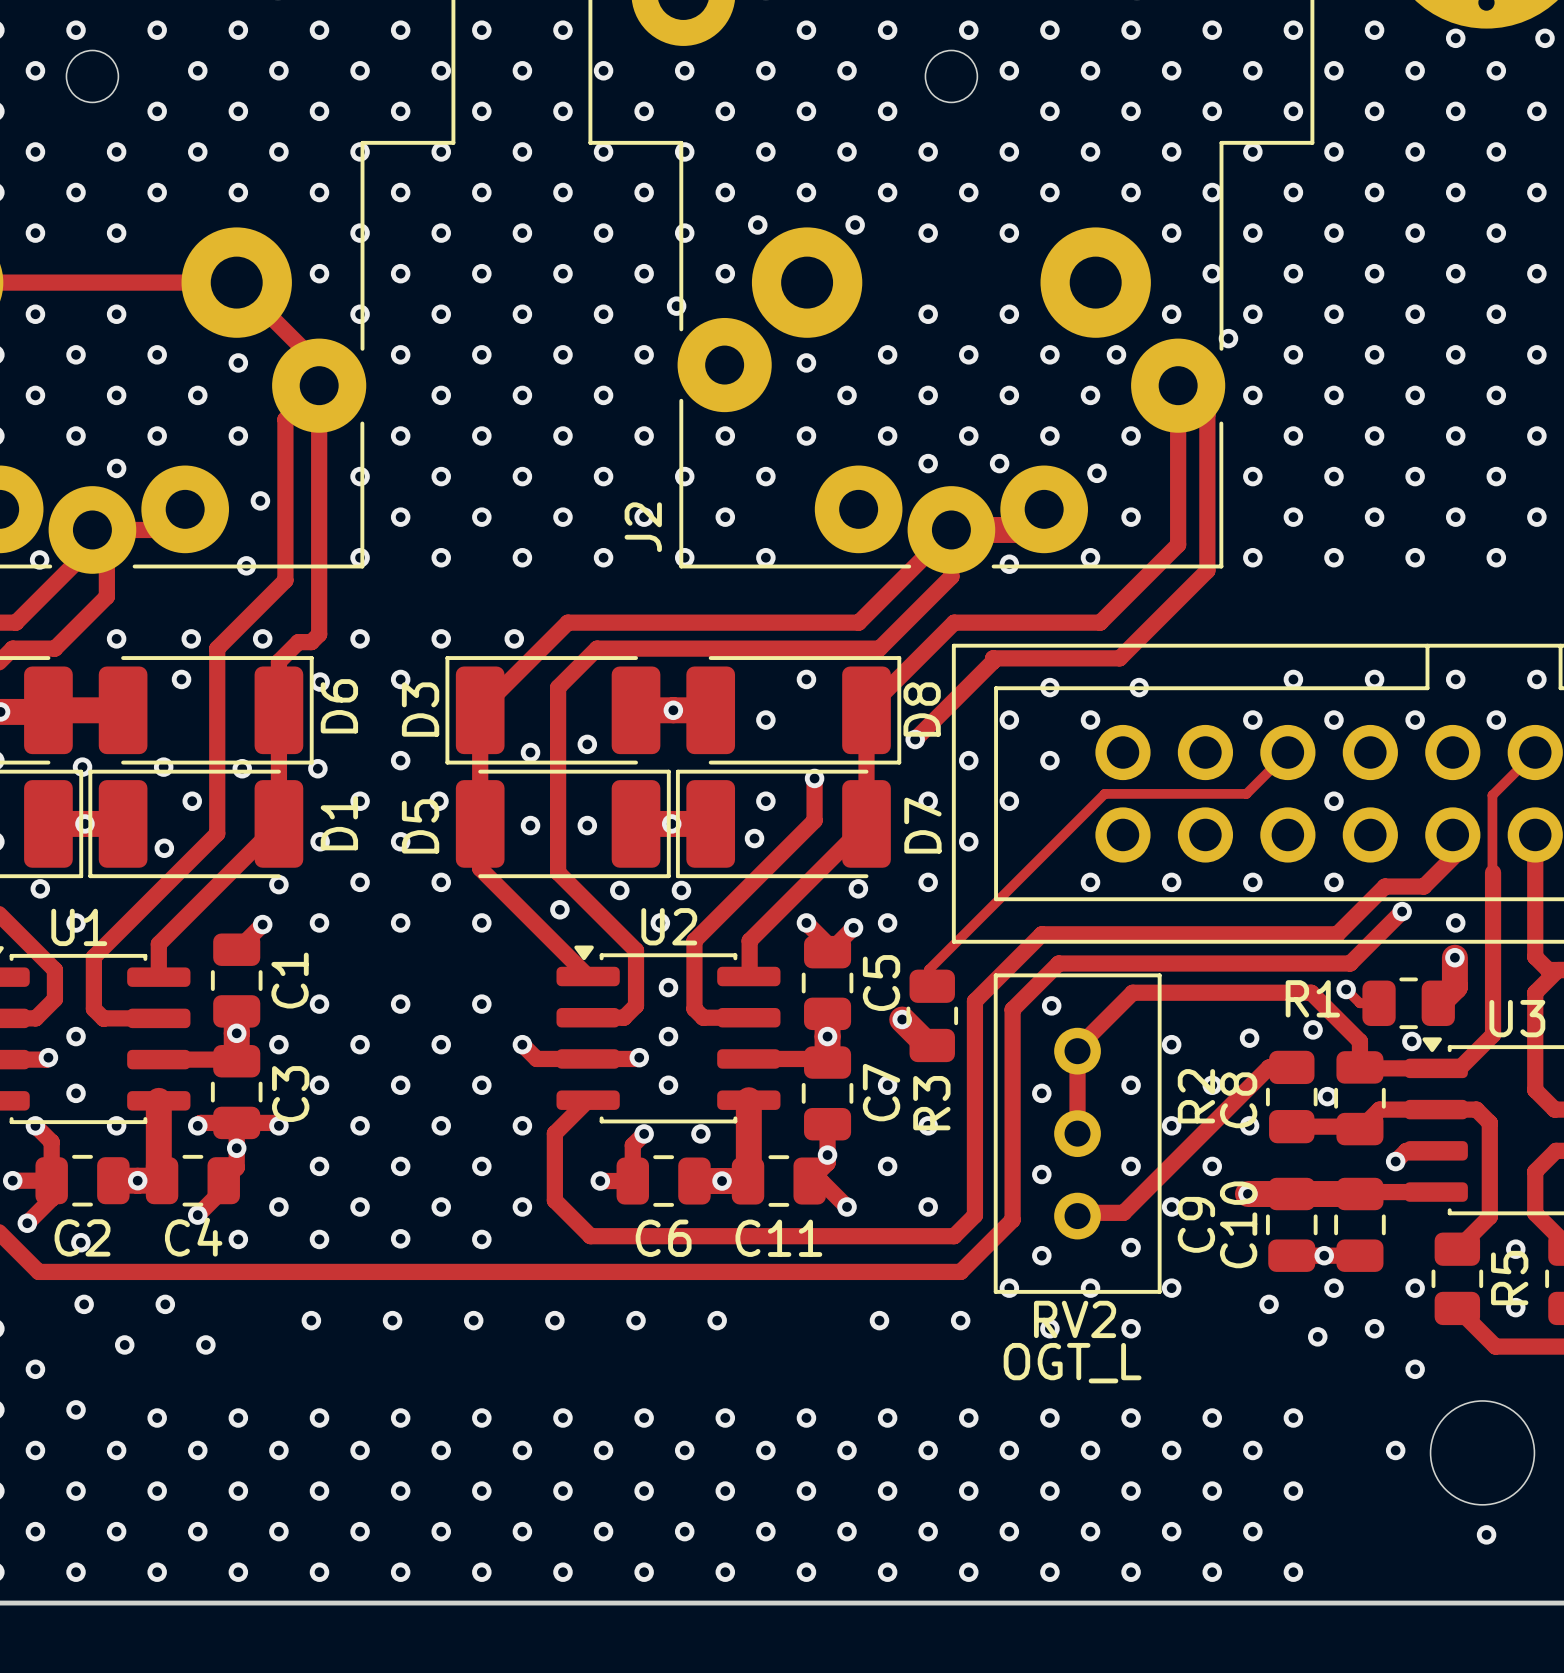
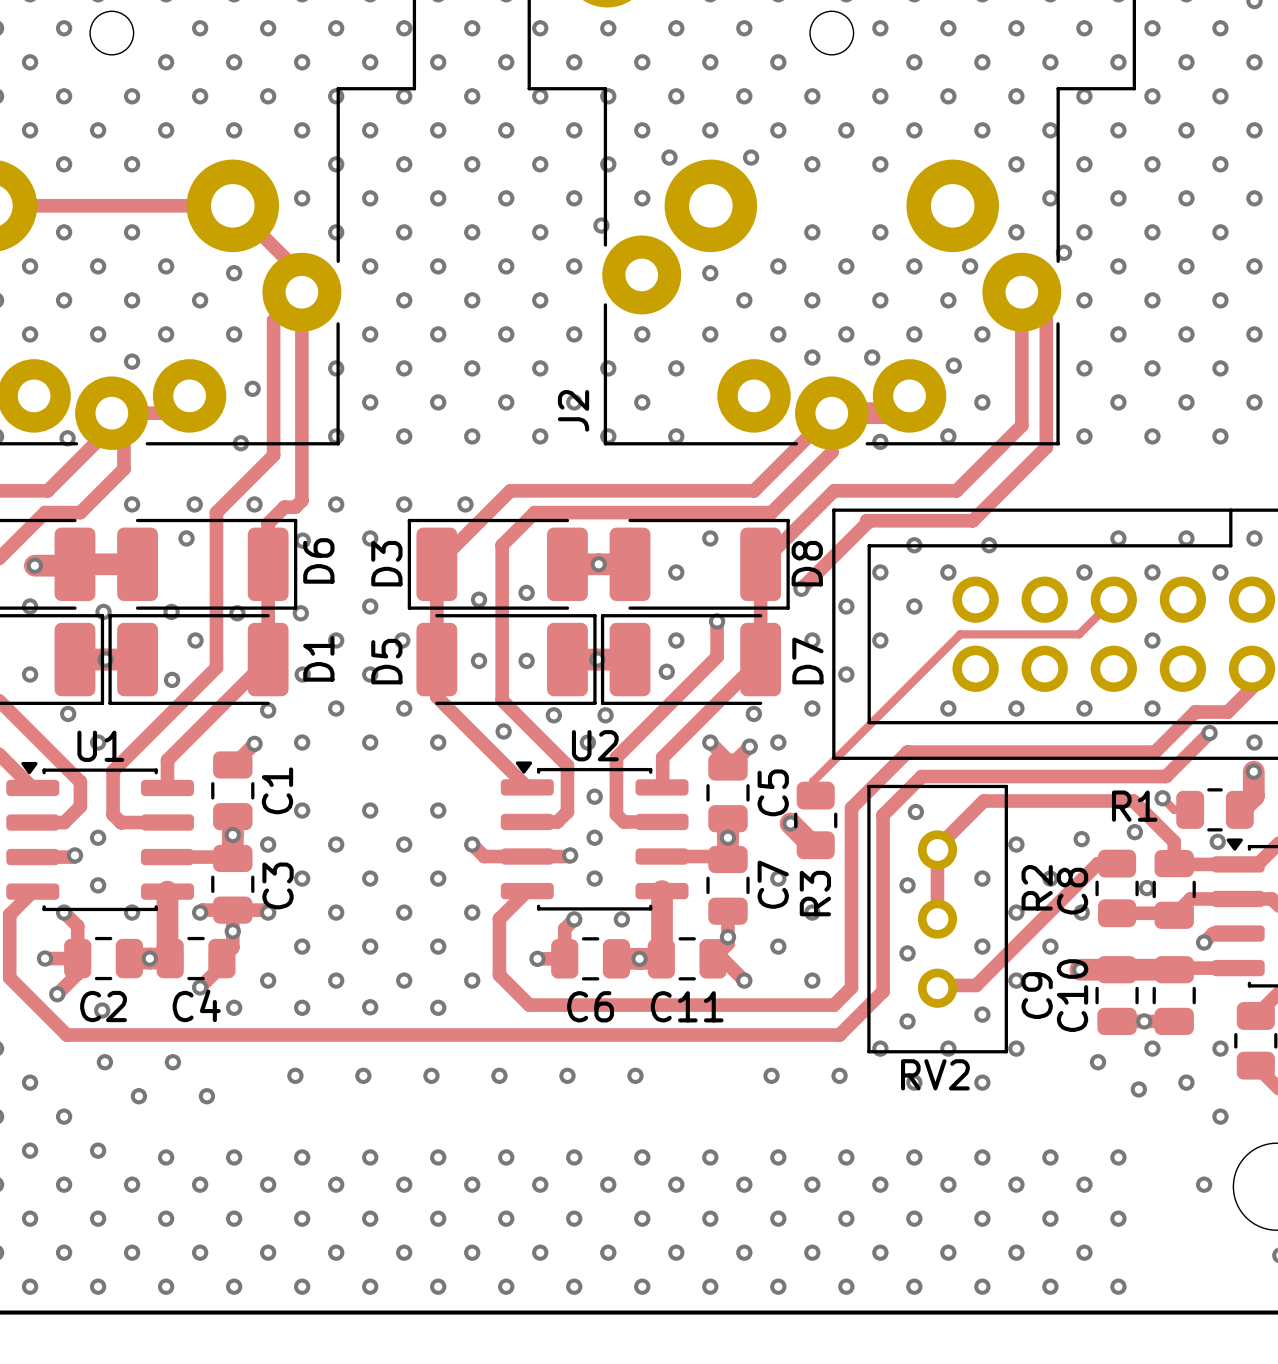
RV2 text: OGT_L (1072, 1363) -> none

